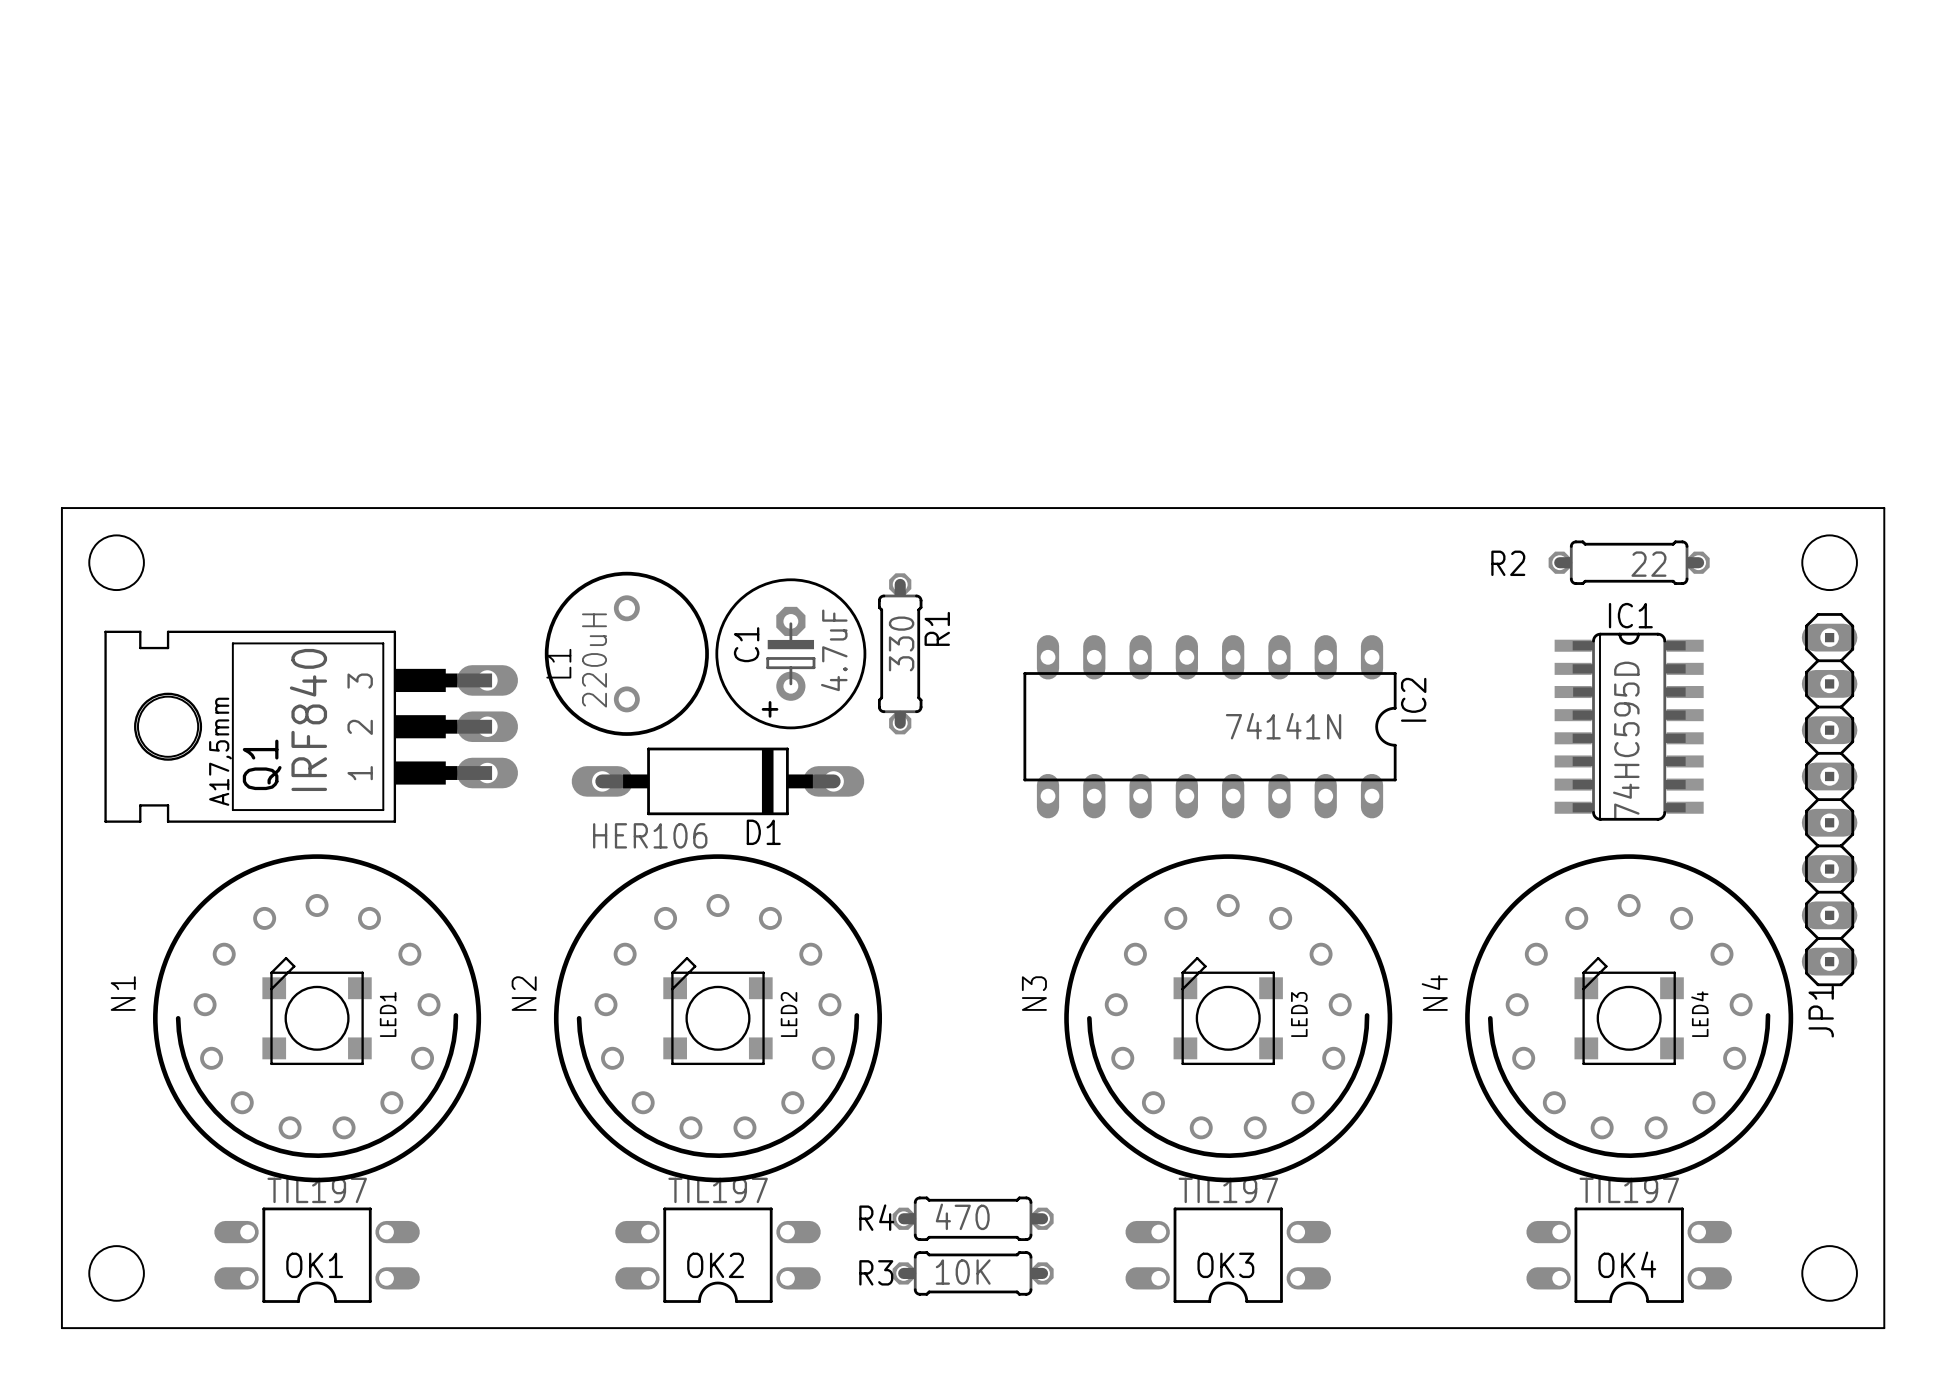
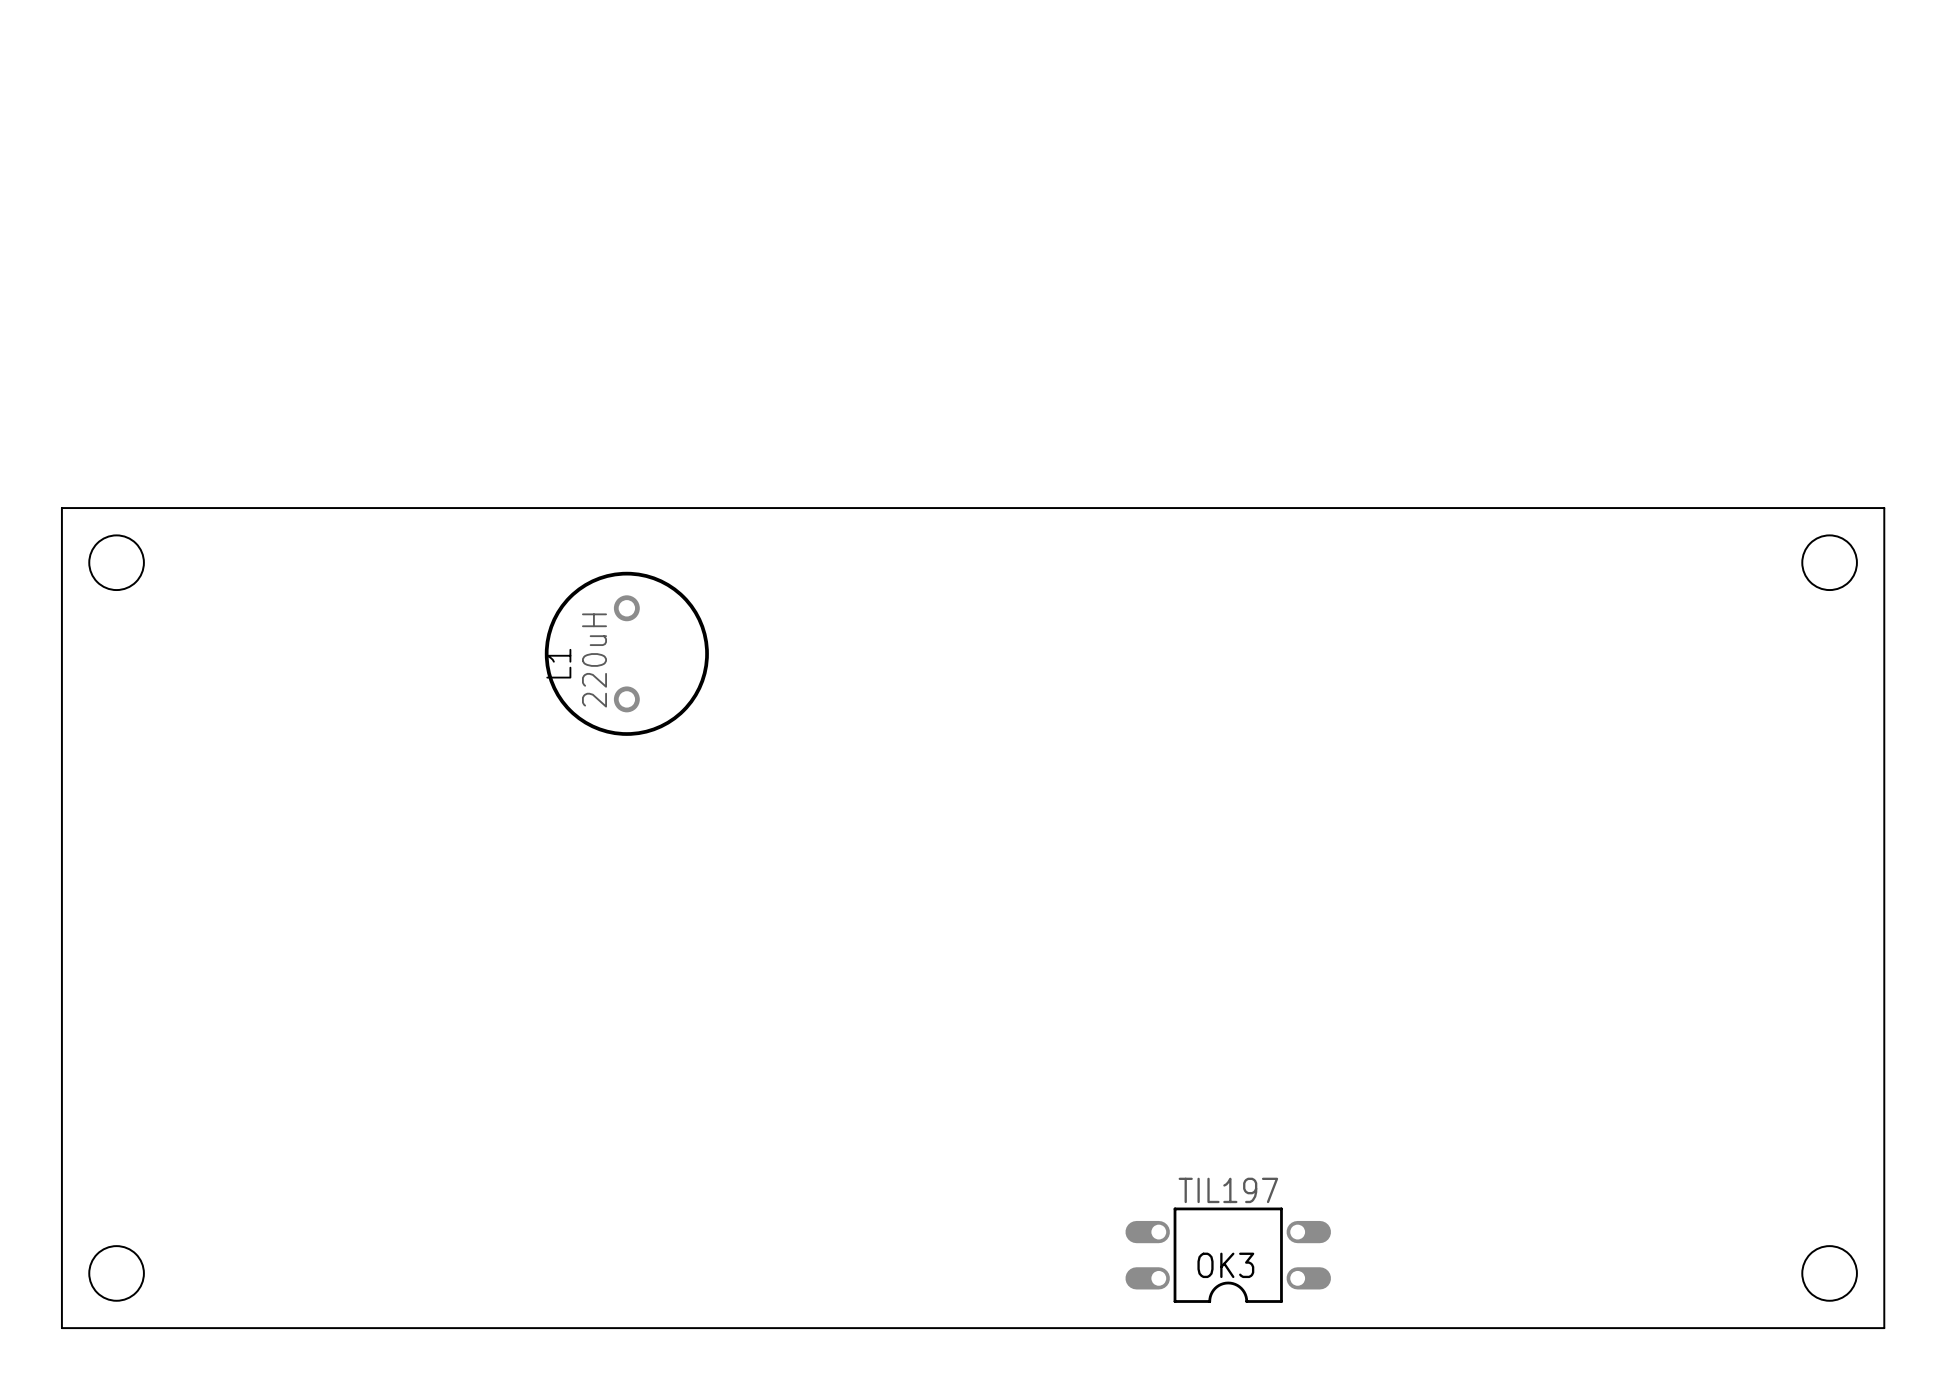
R2: 22 (1629, 562) -> none
C1: 4.7uF (790, 653) -> none
R1: 330 (900, 653) -> none
Q1: IRF840 (311, 726) -> none
IC2: 74141N (1210, 726) -> none
IC1: 74HC595D (1629, 726) -> none
D1: HER106 (717, 781) -> none
JP1: (1829, 799) -> none
LED1: (317, 1011) -> none
LED2: (717, 1011) -> none
LED3: (1228, 1011) -> none
LED4: (1629, 1011) -> none
N1: (317, 1018) -> none
N2: (717, 1018) -> none
N3: (1228, 1018) -> none
N4: (1629, 1018) -> none
R4: 470 (973, 1218) -> none
OK1: TIL197 (317, 1255) -> none
OK2: TIL197 (717, 1255) -> none
OK4: TIL197 (1629, 1255) -> none
R3: 10K (973, 1273) -> none

